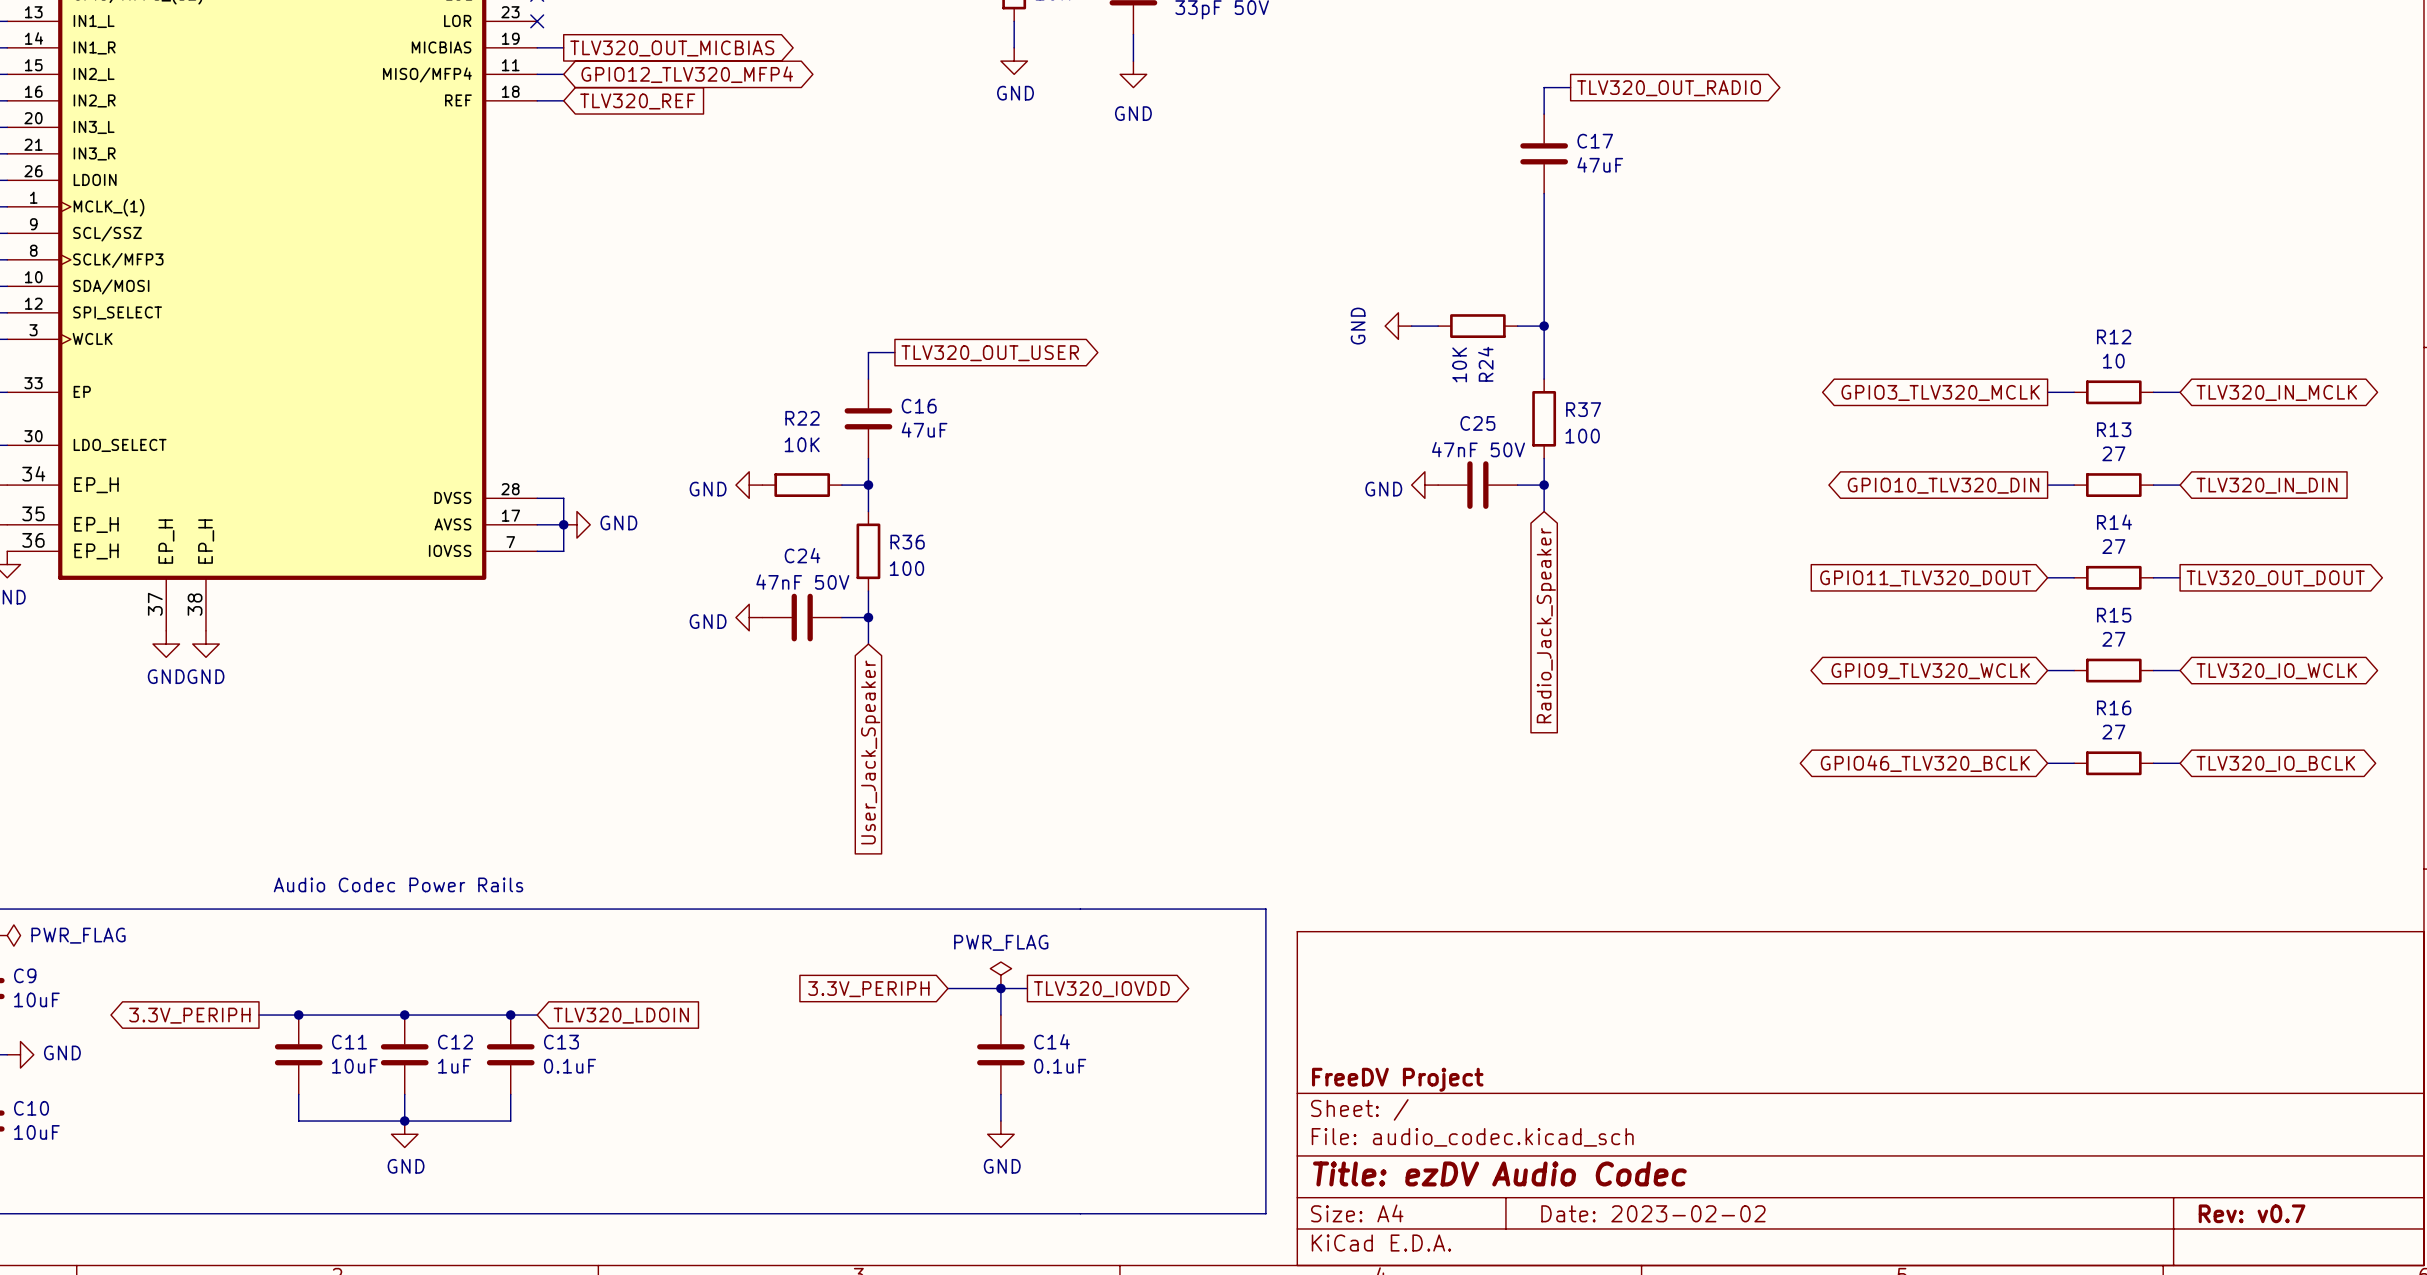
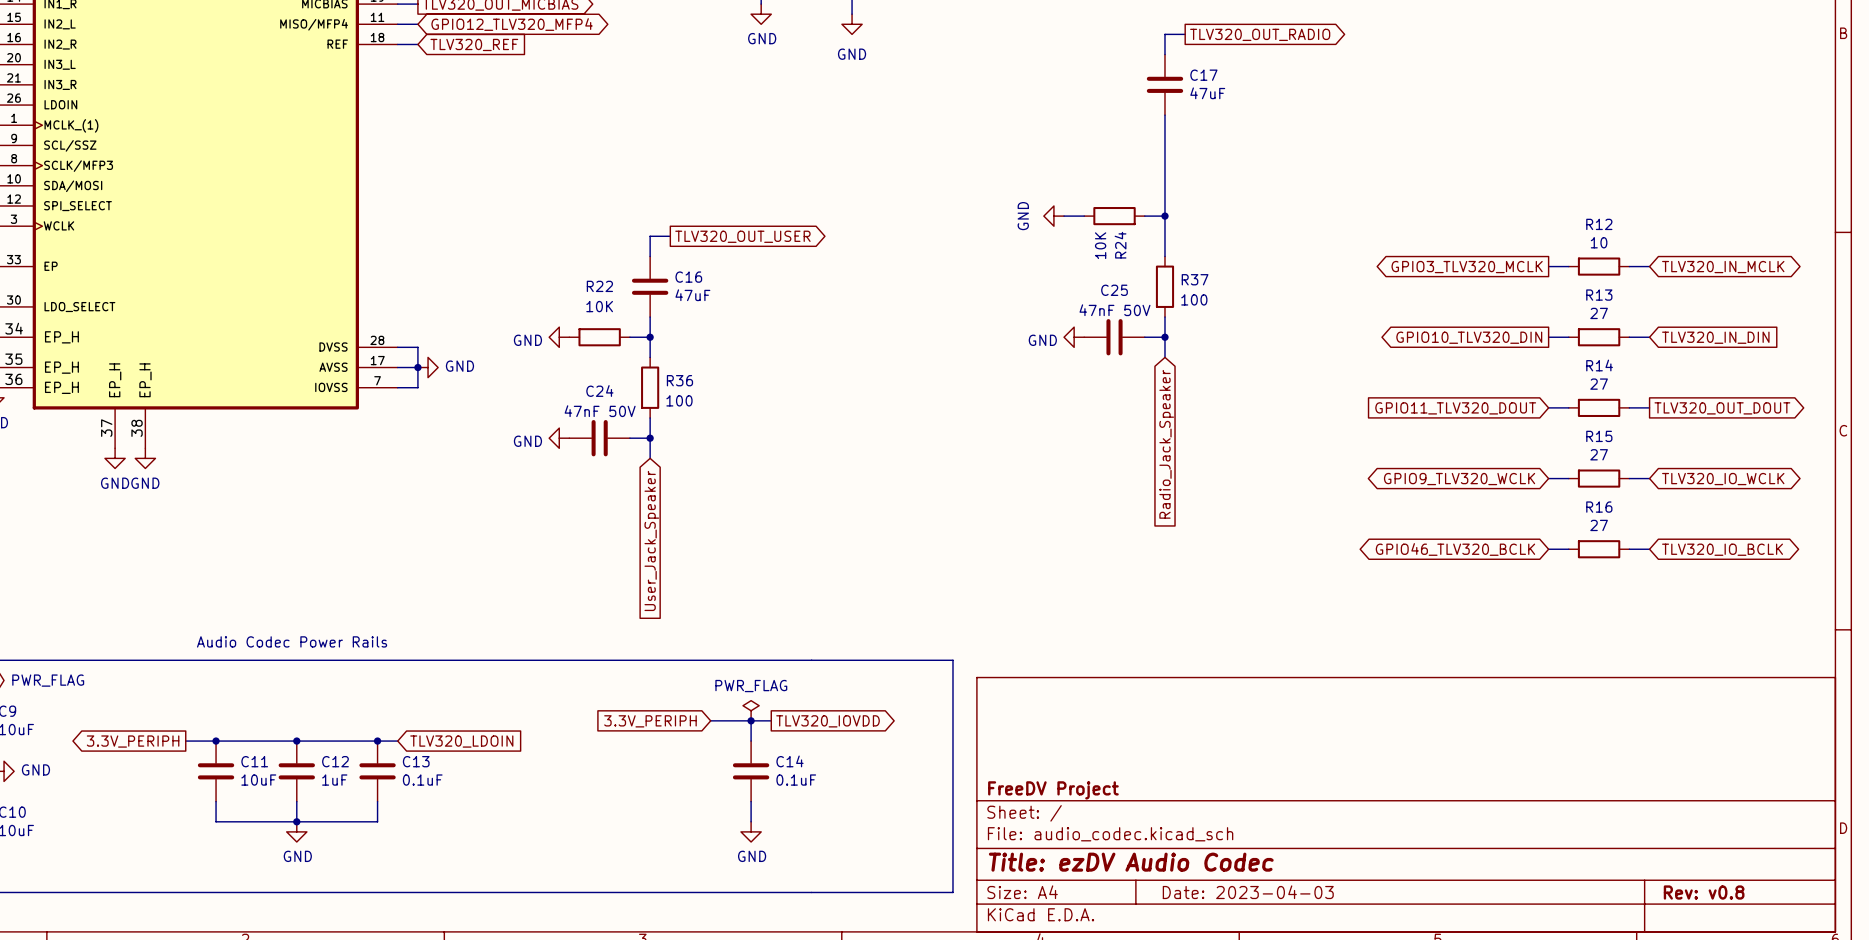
title block: Date: 2023-02-02 (1653, 1213) -> Date: 2023-04-03 (1248, 892)
title block: Rev: v0.7 (2252, 1213) -> Rev: v0.8 (1704, 892)

